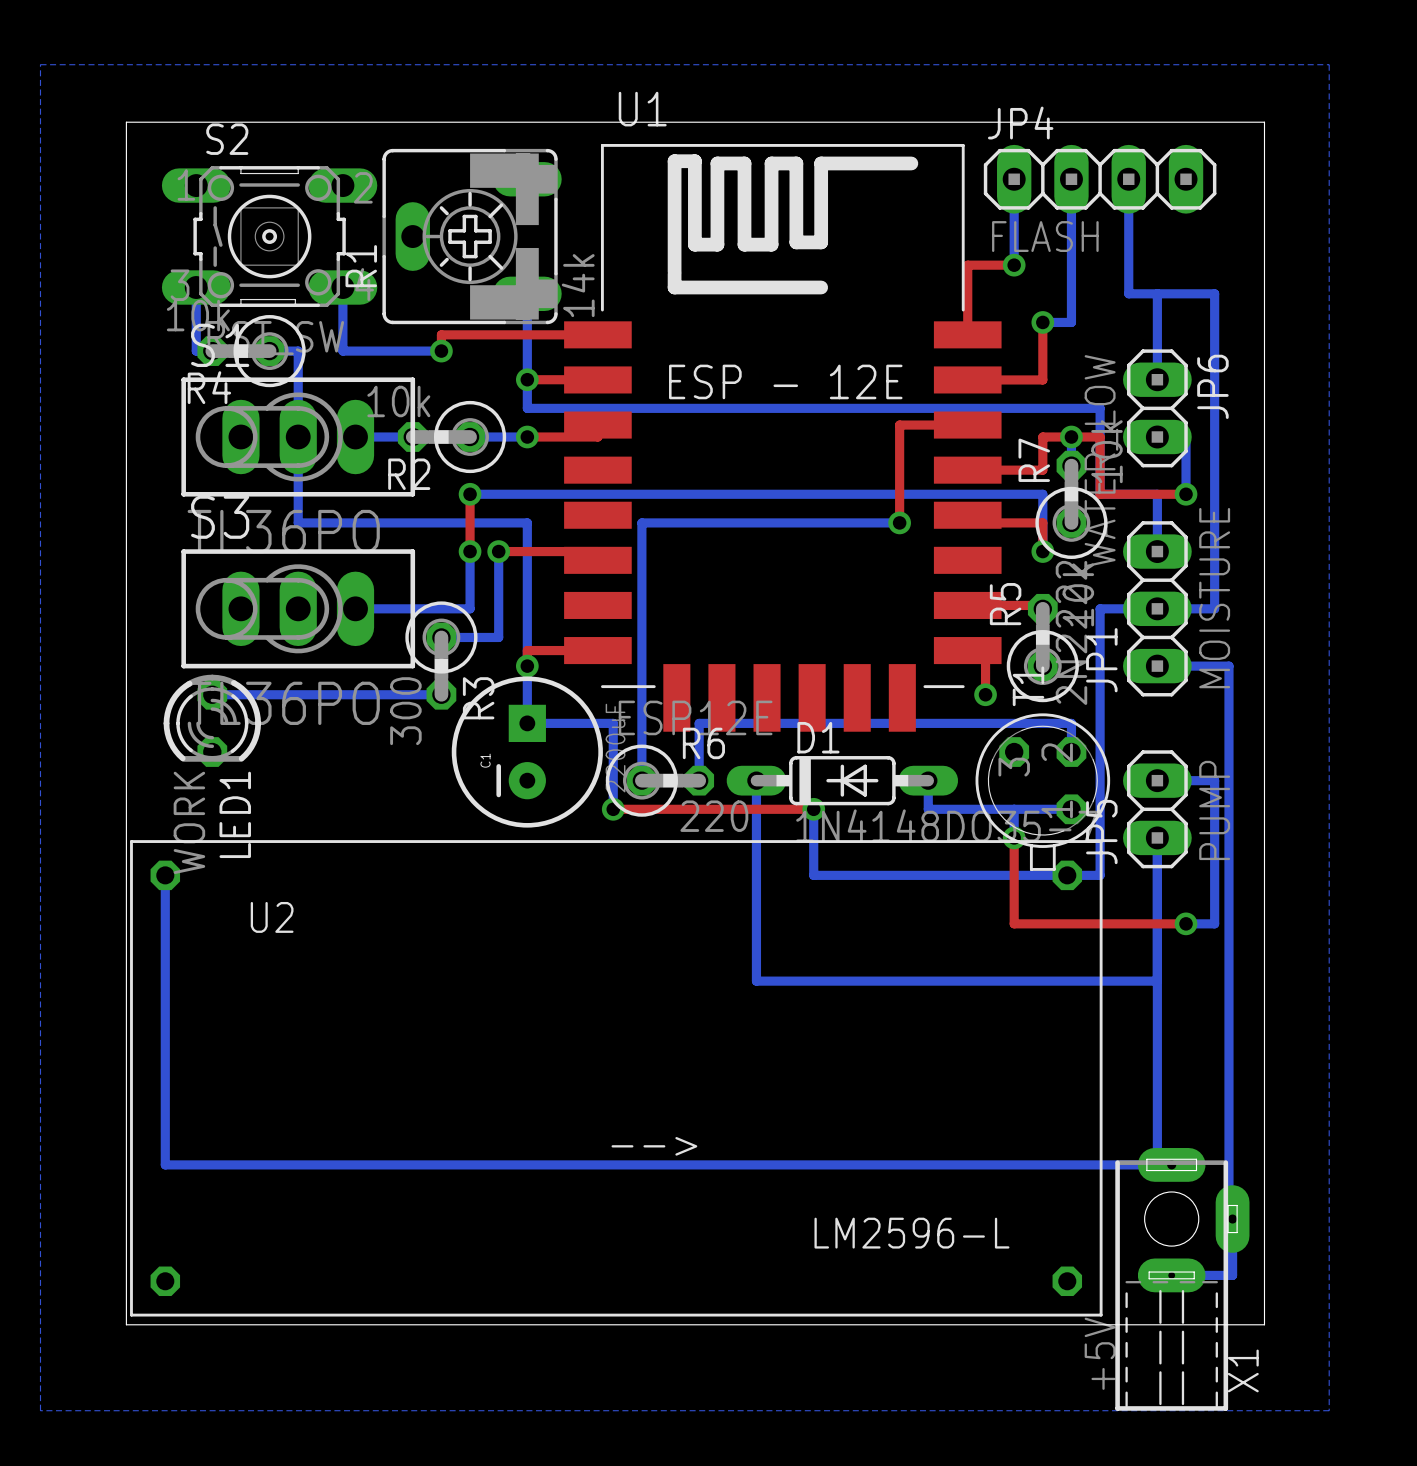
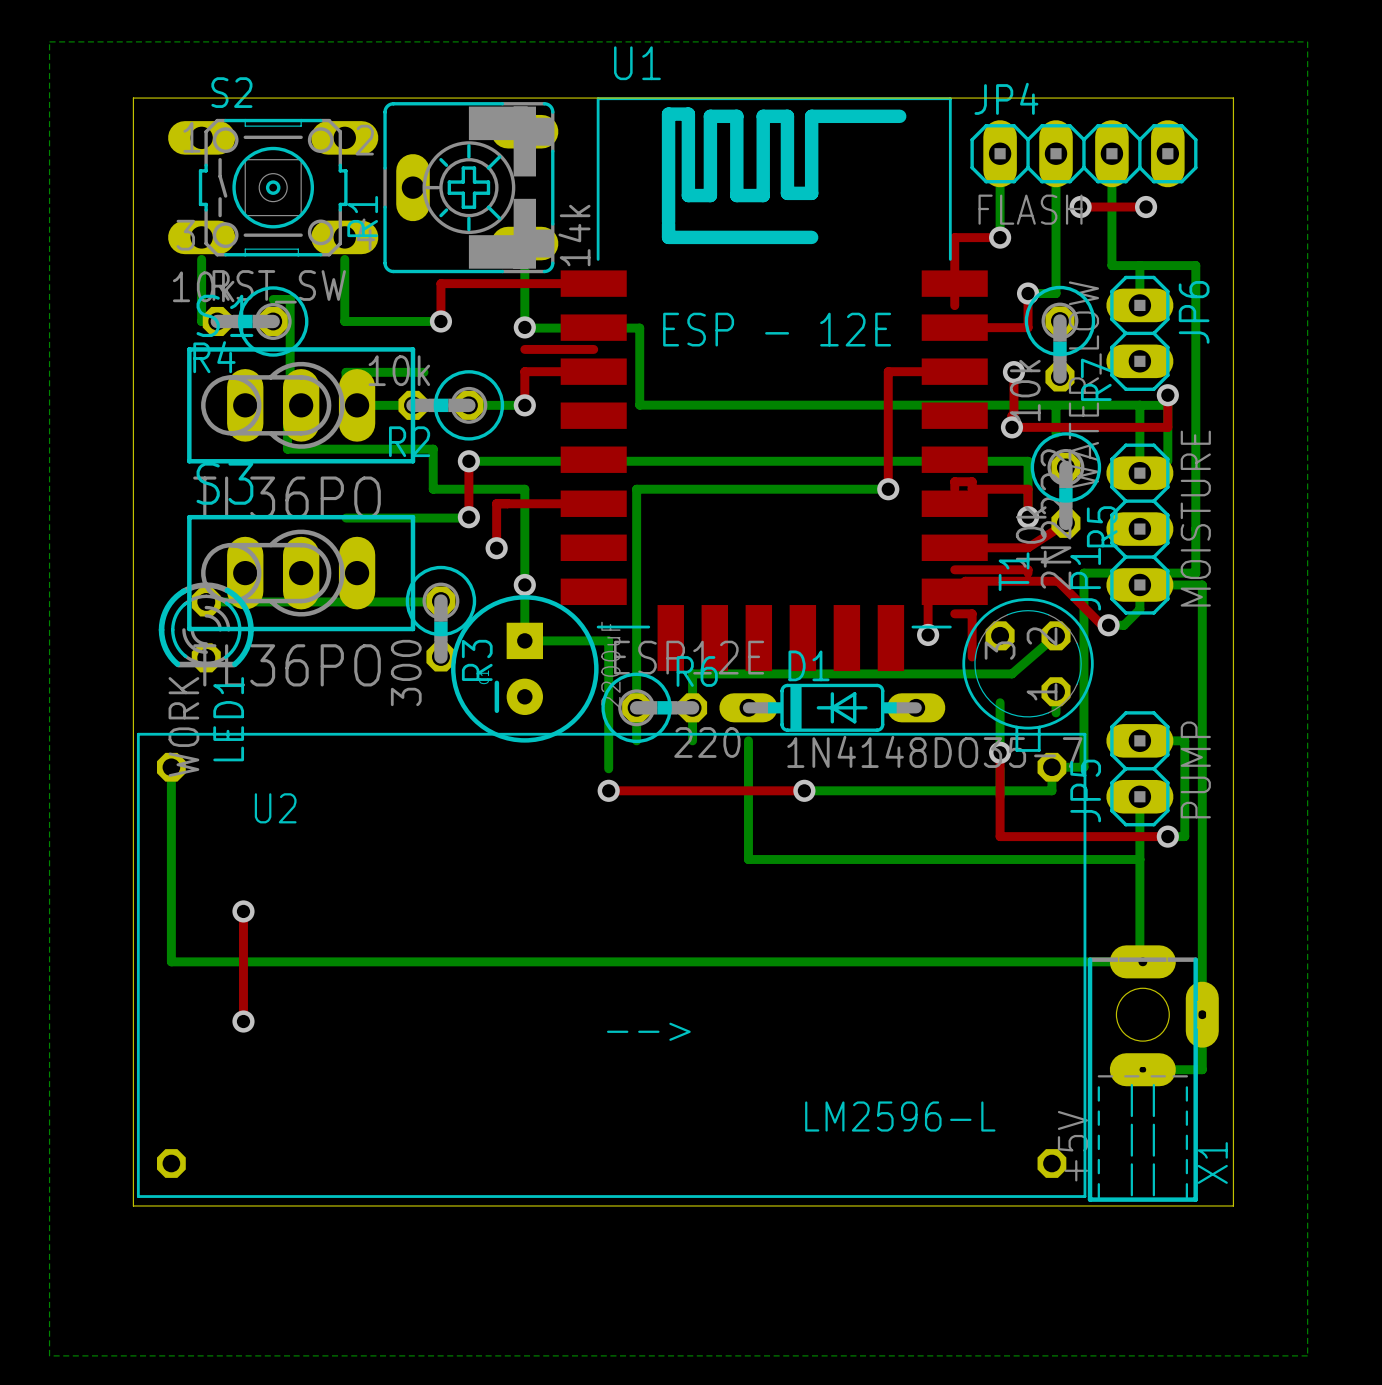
board edge: (1253, 122) (1264, 122) (1264, 1324) (126, 1324) (126, 1257) -> (1233, 98) (1233, 1205) (133, 1205)
top track: none -> (1080, 207) (1146, 207)
via: none -> (1080, 207)
via: none -> (1146, 207)
S2 position: (269, 236) -> (273, 187)
R1 position: (472, 236) -> (470, 187)
top track: (441, 334) (597, 334) -> (440, 305) (440, 283) (593, 283)
bottom track: (1157, 334) (1157, 379) -> none
bottom track: (269, 351) (298, 351) (298, 522) (433, 522) -> (273, 299) (290, 299) (290, 394) (287, 394) (287, 449) (433, 449) (433, 489)
bottom track: (527, 357) (527, 408) (1100, 408) (1100, 494) (1157, 494) -> (524, 328) (639, 328) (639, 405) (1139, 405) (1139, 461)
top track: (1042, 357) (1042, 379) (967, 379) -> (1028, 327) (954, 327)
via position: (527, 379) -> (524, 327)
top track: none -> (1013, 372) (1011, 427) (1167, 427) (1167, 395)
via: none -> (1013, 372)
bottom track: none -> (423, 372) (346, 372) (346, 394)
JP6 position: (1157, 408) -> (1139, 333)
top track: (597, 425) (597, 437) (527, 437) -> (593, 371) (524, 371) (524, 405)
top track: (899, 425) (967, 425) -> (888, 393) (888, 371) (954, 371)
via: none -> (1167, 395)
U1 position: (782, 437) -> (774, 384)
via: (1071, 437) -> none
via: none -> (1011, 427)
top track: (967, 470) (1042, 470) (1042, 437) (1100, 437) (1100, 494) (1186, 494) -> none
via: (1186, 494) -> none
R7 rotation: 0° (1071, 504) -> 180° (1059, 338)
R7 position: (1071, 504) -> (1059, 338)
bottom track: (1157, 506) (1157, 551) -> none
top track: none -> (593, 503) (496, 503) (496, 548)
top track: (498, 551) (597, 551) (597, 560) -> none
bottom track: (498, 551) (498, 637) (441, 637) -> (206, 601) (440, 601)
via position: (498, 551) -> (496, 548)
bottom track: (470, 552) (470, 608) (355, 608) -> (468, 518) (346, 518)
top track: none -> (1065, 523) (1028, 547) (954, 547)
JP1 position: (1157, 608) -> (1139, 529)
via: none -> (524, 584)
R5 rotation: 0° (1042, 648) -> 180° (1065, 485)
R5 position: (1042, 648) -> (1065, 485)
top track: (597, 650) (527, 650) (527, 666) -> none
top track: none -> (1108, 625) (1102, 625) (1057, 581) (965, 581) (954, 591) (928, 591) (928, 634)
bottom track: none -> (1108, 625) (1124, 625) (1139, 609) (1139, 584) (1202, 584) (1202, 1069) (1142, 1069)
via: none -> (1108, 625)
via: (527, 666) -> none
bottom track: (1157, 666) (1228, 666) (1228, 1219) (1232, 1219) (1232, 1275) (1171, 1275) -> none
bottom track: (527, 678) (527, 723) (613, 723) -> (524, 640) (608, 640) (608, 684)
bottom track: (212, 694) (441, 694) -> none
via position: (985, 694) -> (928, 634)
LED1 position: (212, 720) -> (206, 627)
bottom track: (699, 723) (1071, 723) (1071, 730) -> (692, 684) (692, 673) (1011, 673) (1056, 635)
bottom track: none -> (1000, 702) (1000, 752)
C1 position: (527, 752) -> (524, 668)
R6 position: (659, 780) -> (654, 707)
D1 position: (842, 780) -> (832, 707)
bottom track: (928, 780) (928, 809) (1071, 809) -> none
bottom track: (1203, 780) (1214, 780) (1214, 923) (1186, 923) -> (1184, 740) (1184, 836) (1167, 836)
top track: none -> (1000, 752) (1000, 796)
T1 position: (1042, 792) -> (1028, 674)
bottom track: none -> (171, 767) (171, 833)
bottom track: (1100, 807) (1100, 875) (813, 875) (813, 809) -> (1083, 767) (1051, 767) (1051, 790) (804, 790)
top track: (613, 809) (813, 809) -> (608, 790) (804, 790)
via position: (613, 809) -> (608, 790)
via position: (813, 809) -> (804, 790)
via position: (1014, 837) -> (1000, 752)
top track: (1014, 878) (1014, 923) (1186, 923) -> (1000, 836) (1167, 836)
bottom track: (756, 902) (756, 981) (1157, 981) -> (748, 859) (1139, 859)
via position: (1186, 923) -> (1167, 836)
top track: none -> (243, 911) (243, 1021)
via: none -> (243, 911)
bottom track: (165, 1007) (165, 1164) (1171, 1164) -> (171, 961) (1142, 961)
bottom track: (1157, 1007) (1157, 1164) -> none
via: none -> (243, 1021)
U2 position: (616, 1078) -> (611, 965)
X1 position: (1182, 1279) -> (1153, 1073)

